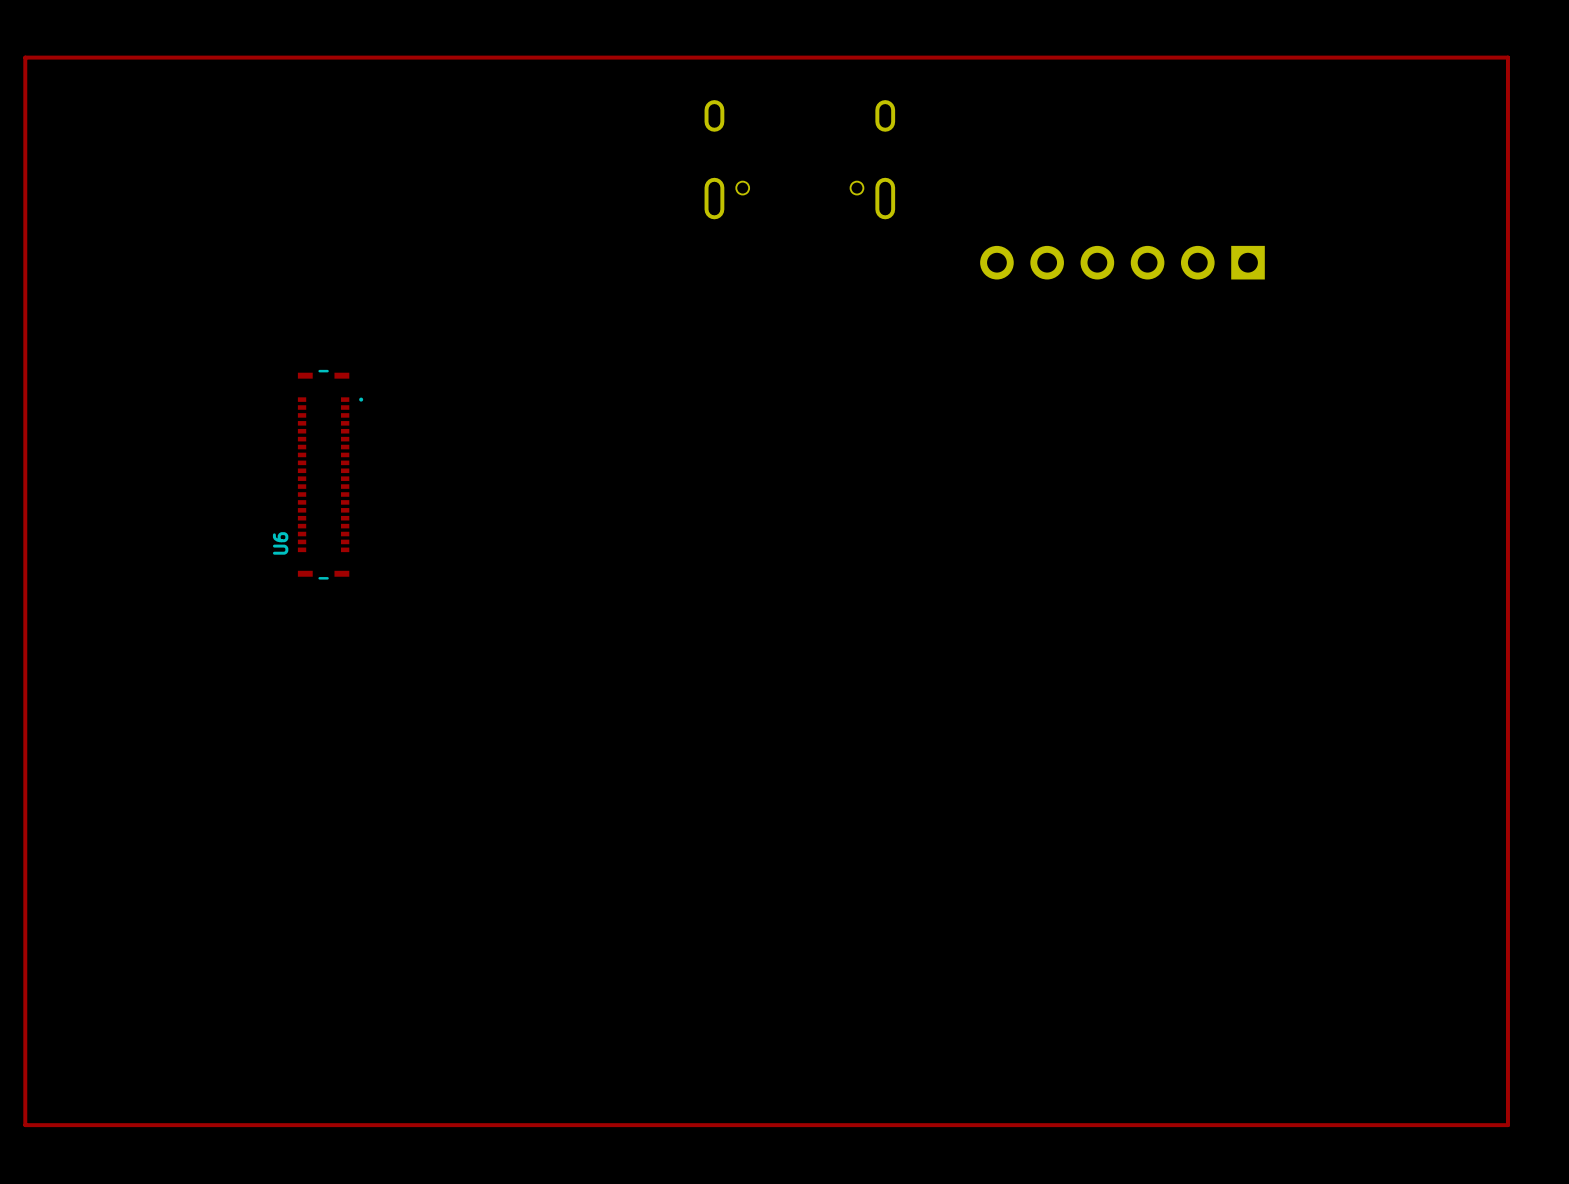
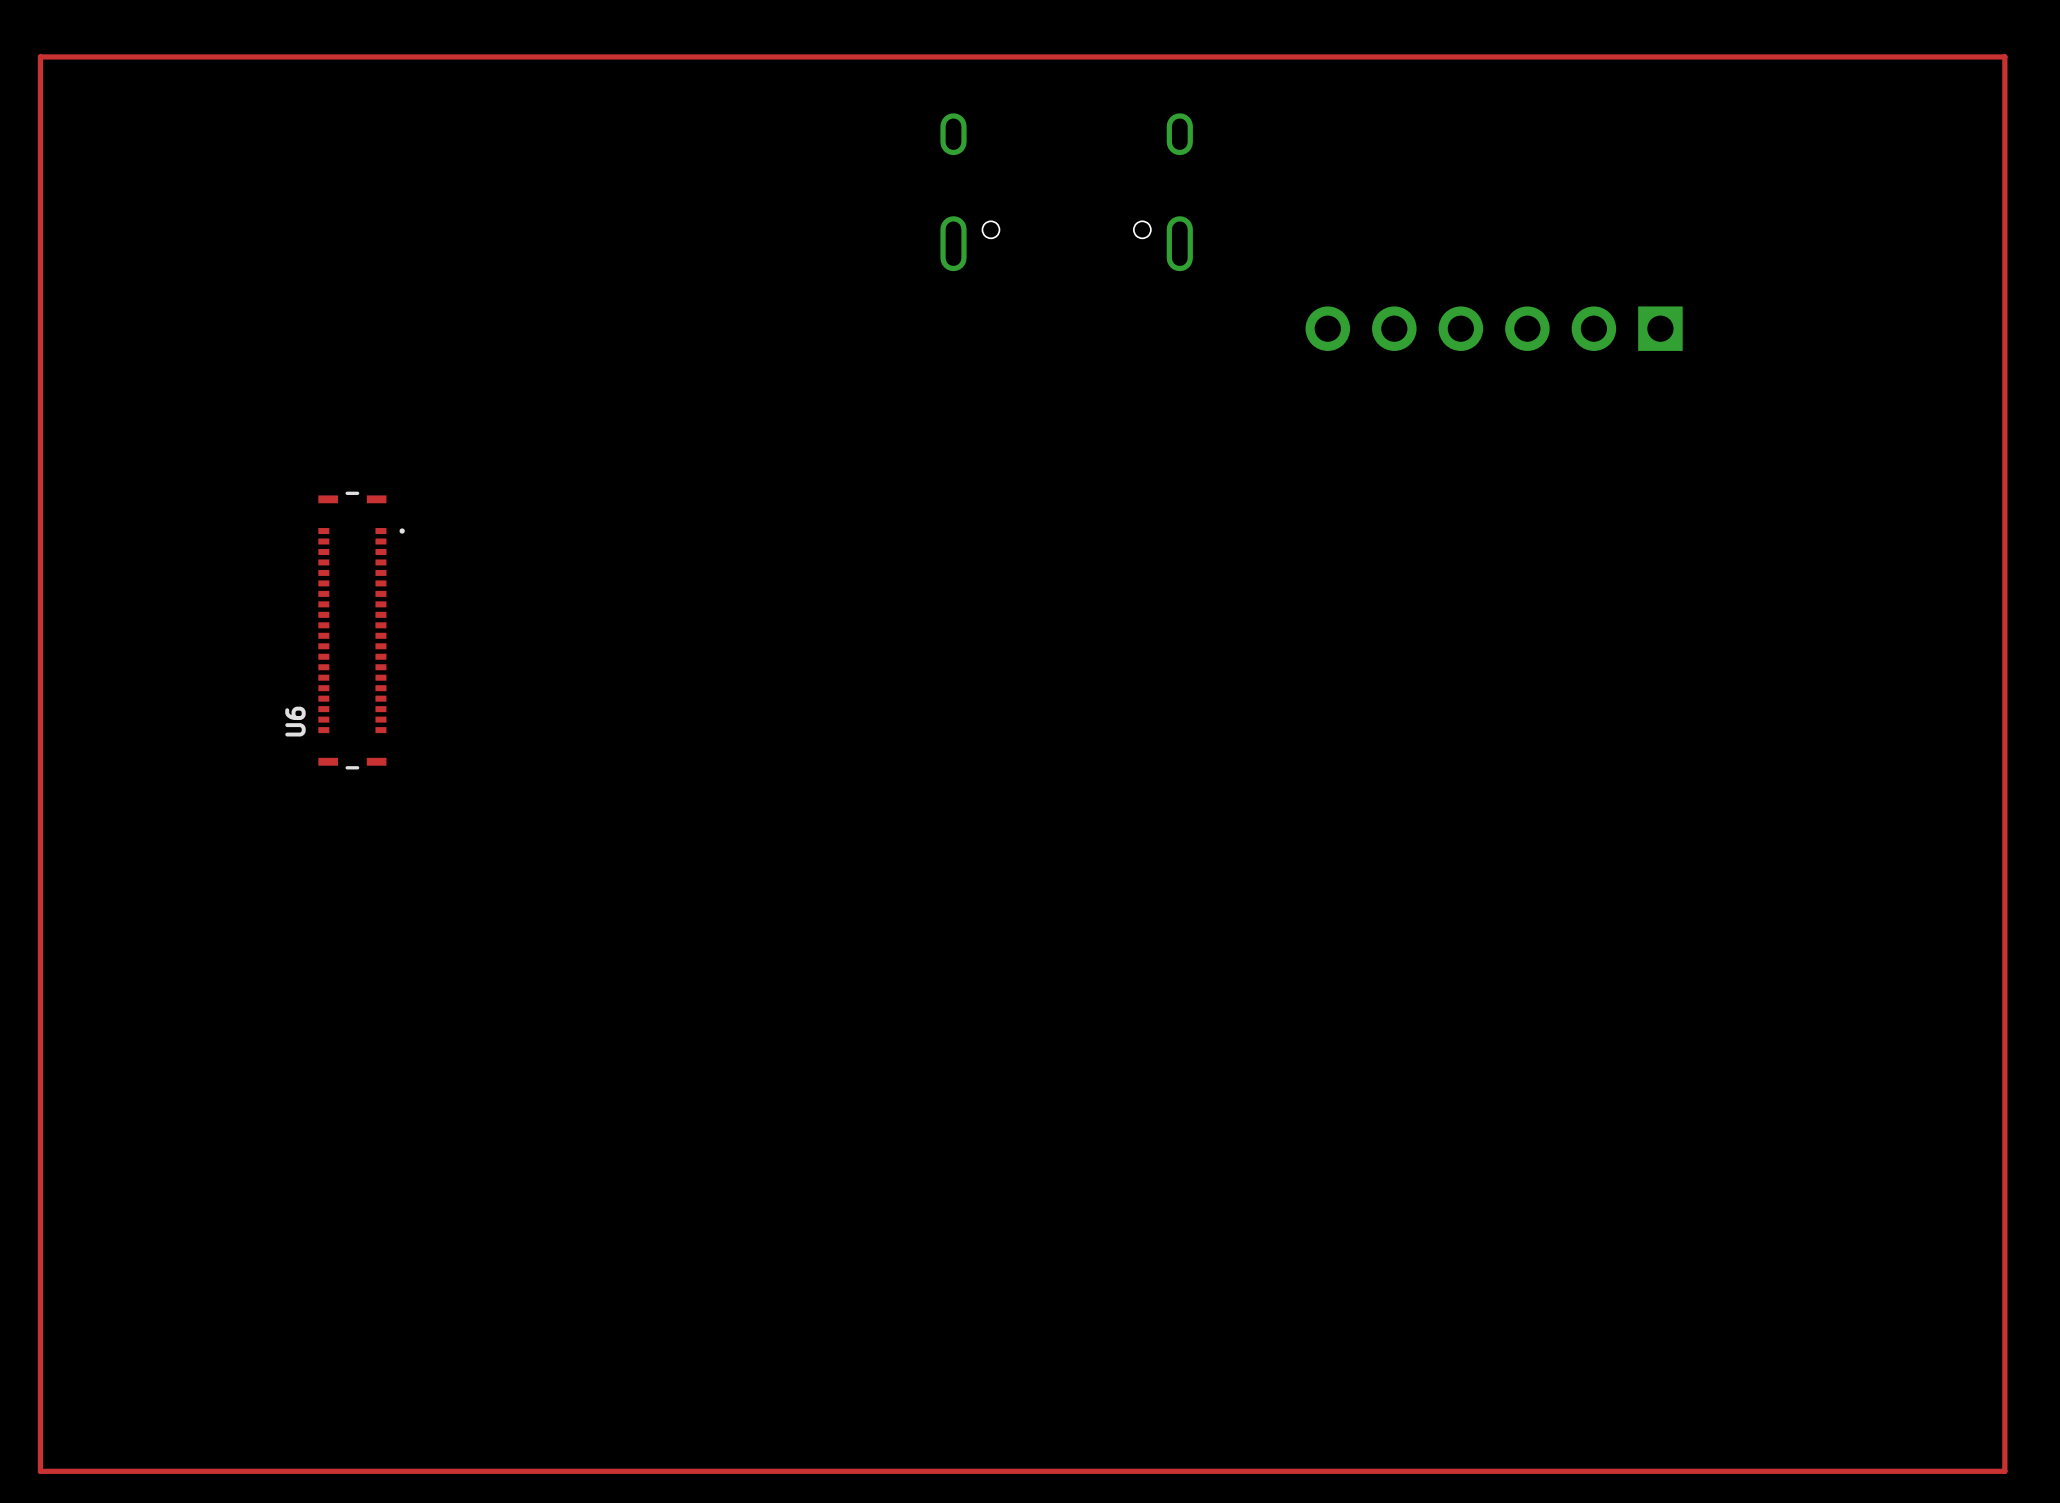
U6 position: (330, 474) -> (361, 630)

